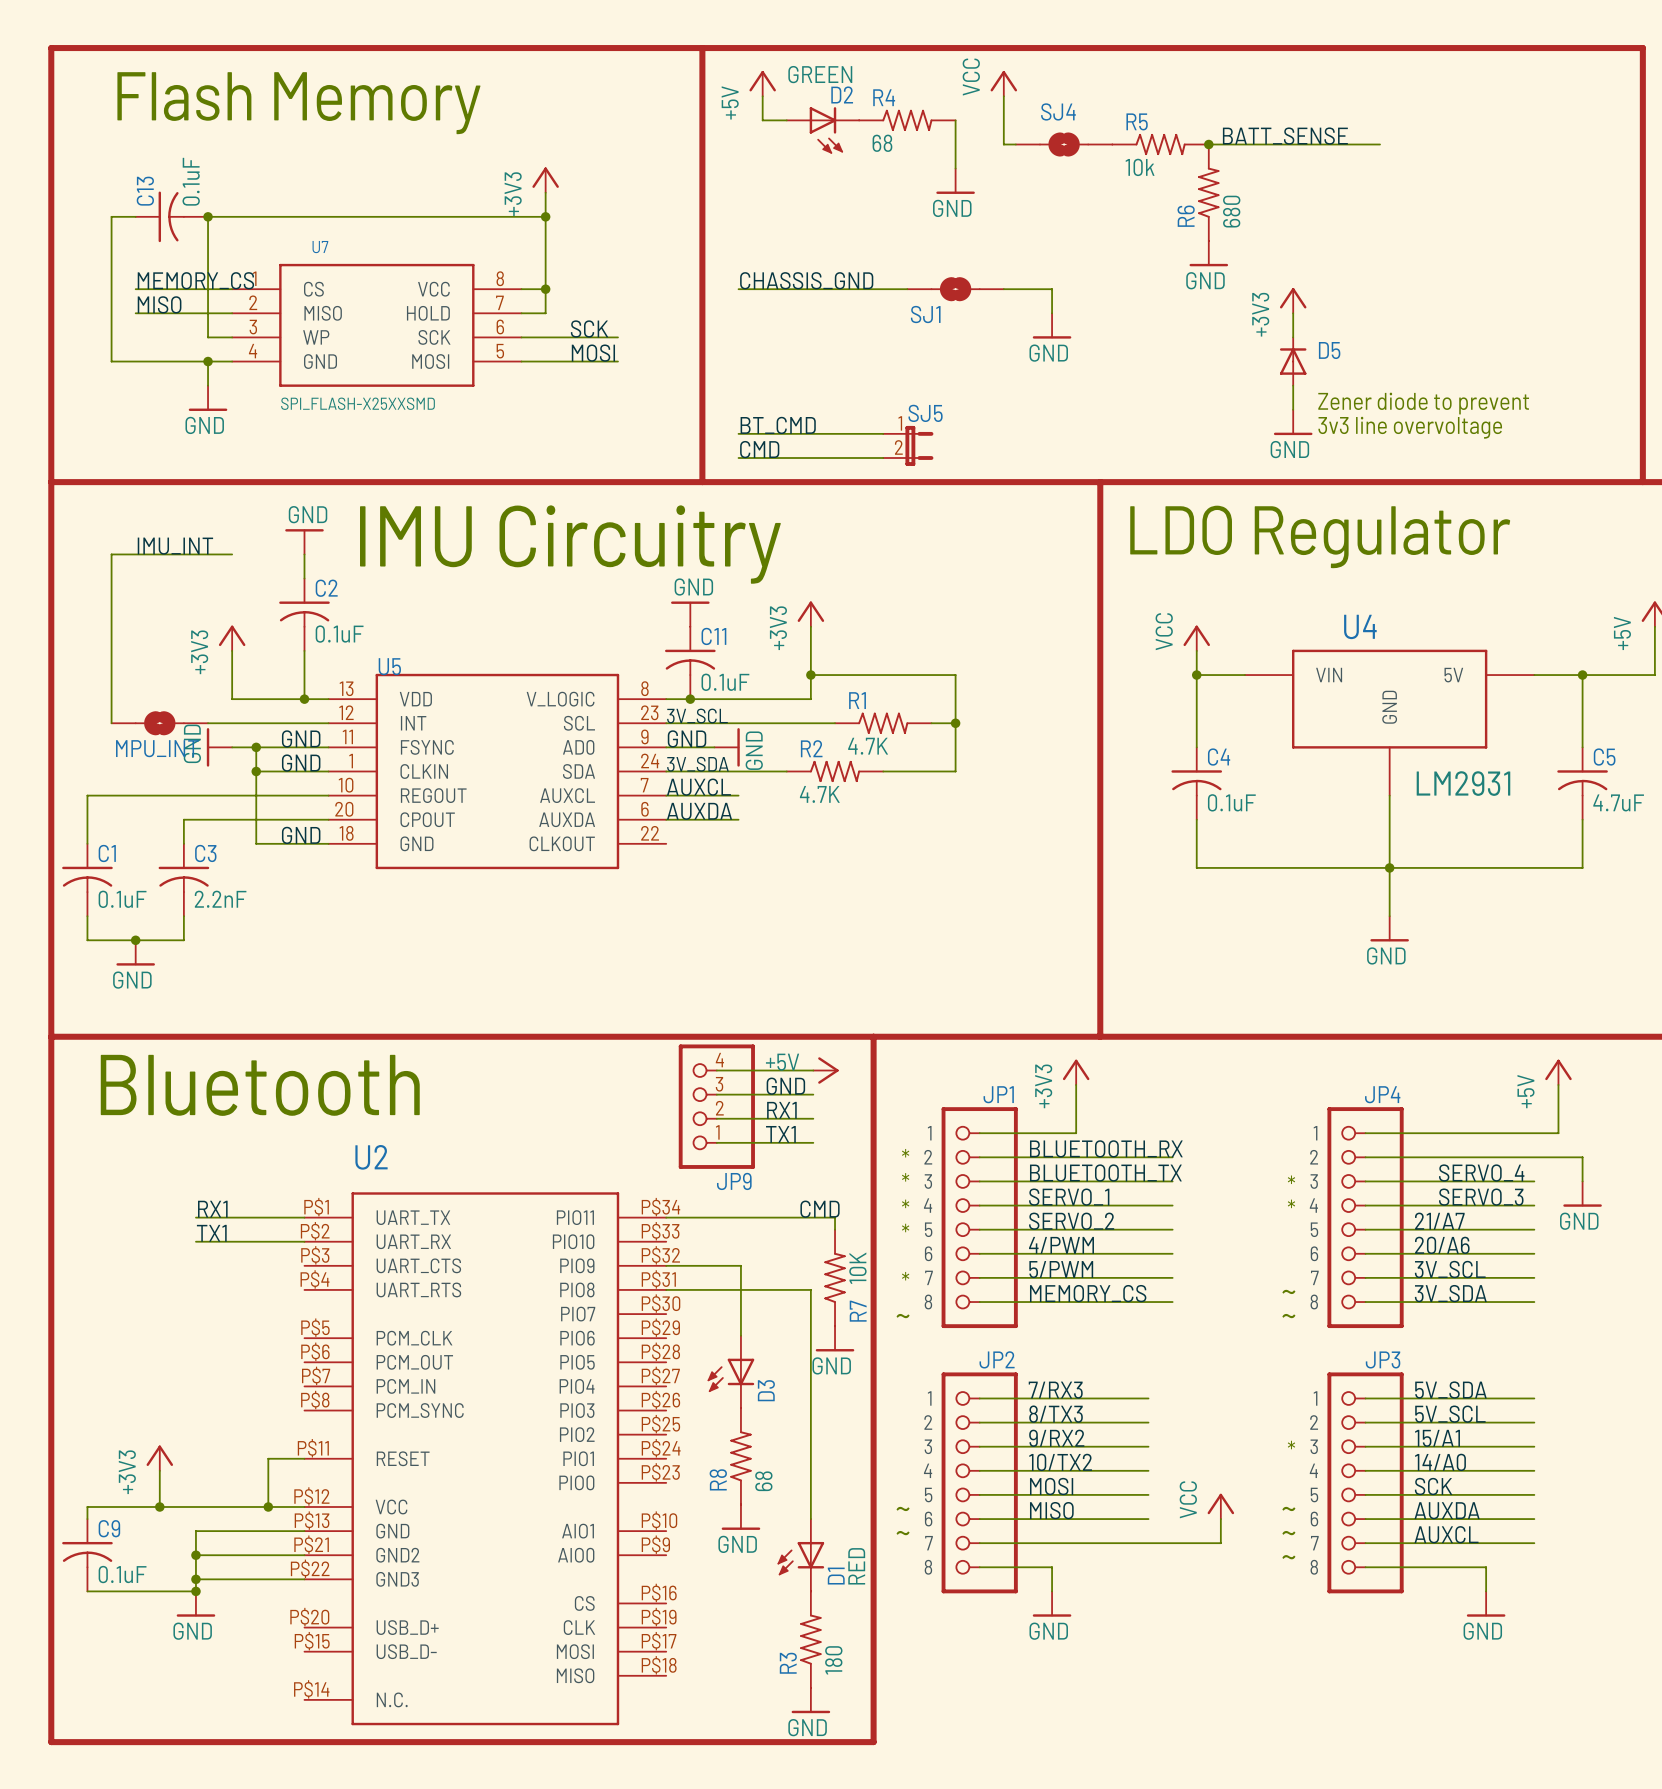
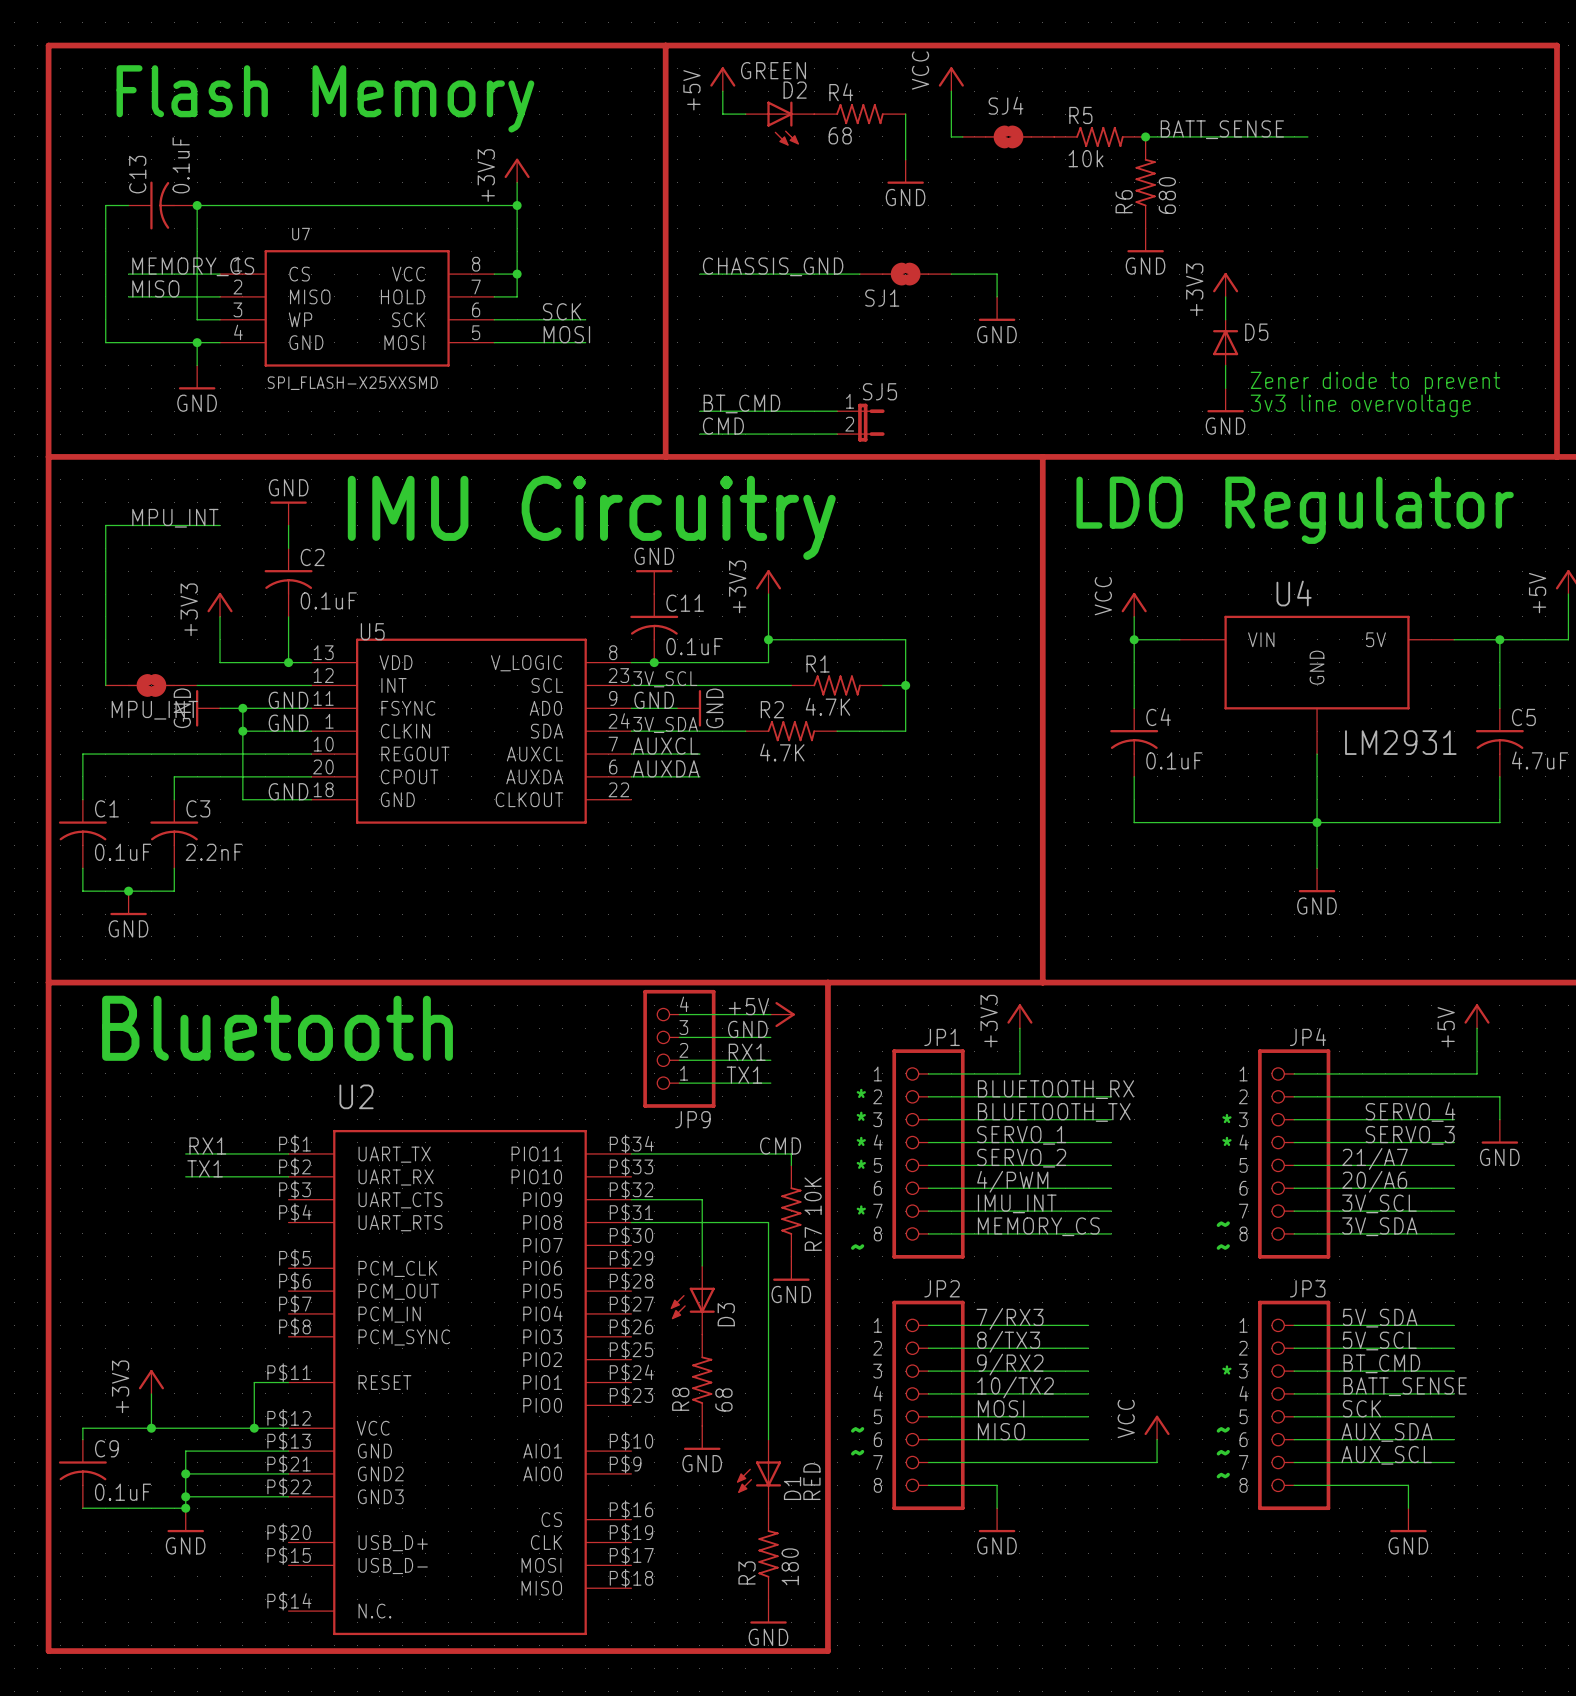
label: IMU_INT (175, 546) -> MPU_INT (175, 518)
label: 5/PWM (1061, 1269) -> IMU_INT (1017, 1203)
label: 15/A1 (1437, 1438) -> BT_CMD (1381, 1363)
label: 14/A0 (1440, 1462) -> BATT_SENSE (1405, 1386)
label: AUXDA (1447, 1510) -> AUX_SDA (1387, 1432)
label: AUXCL (1446, 1534) -> AUX_SCL (1386, 1455)

